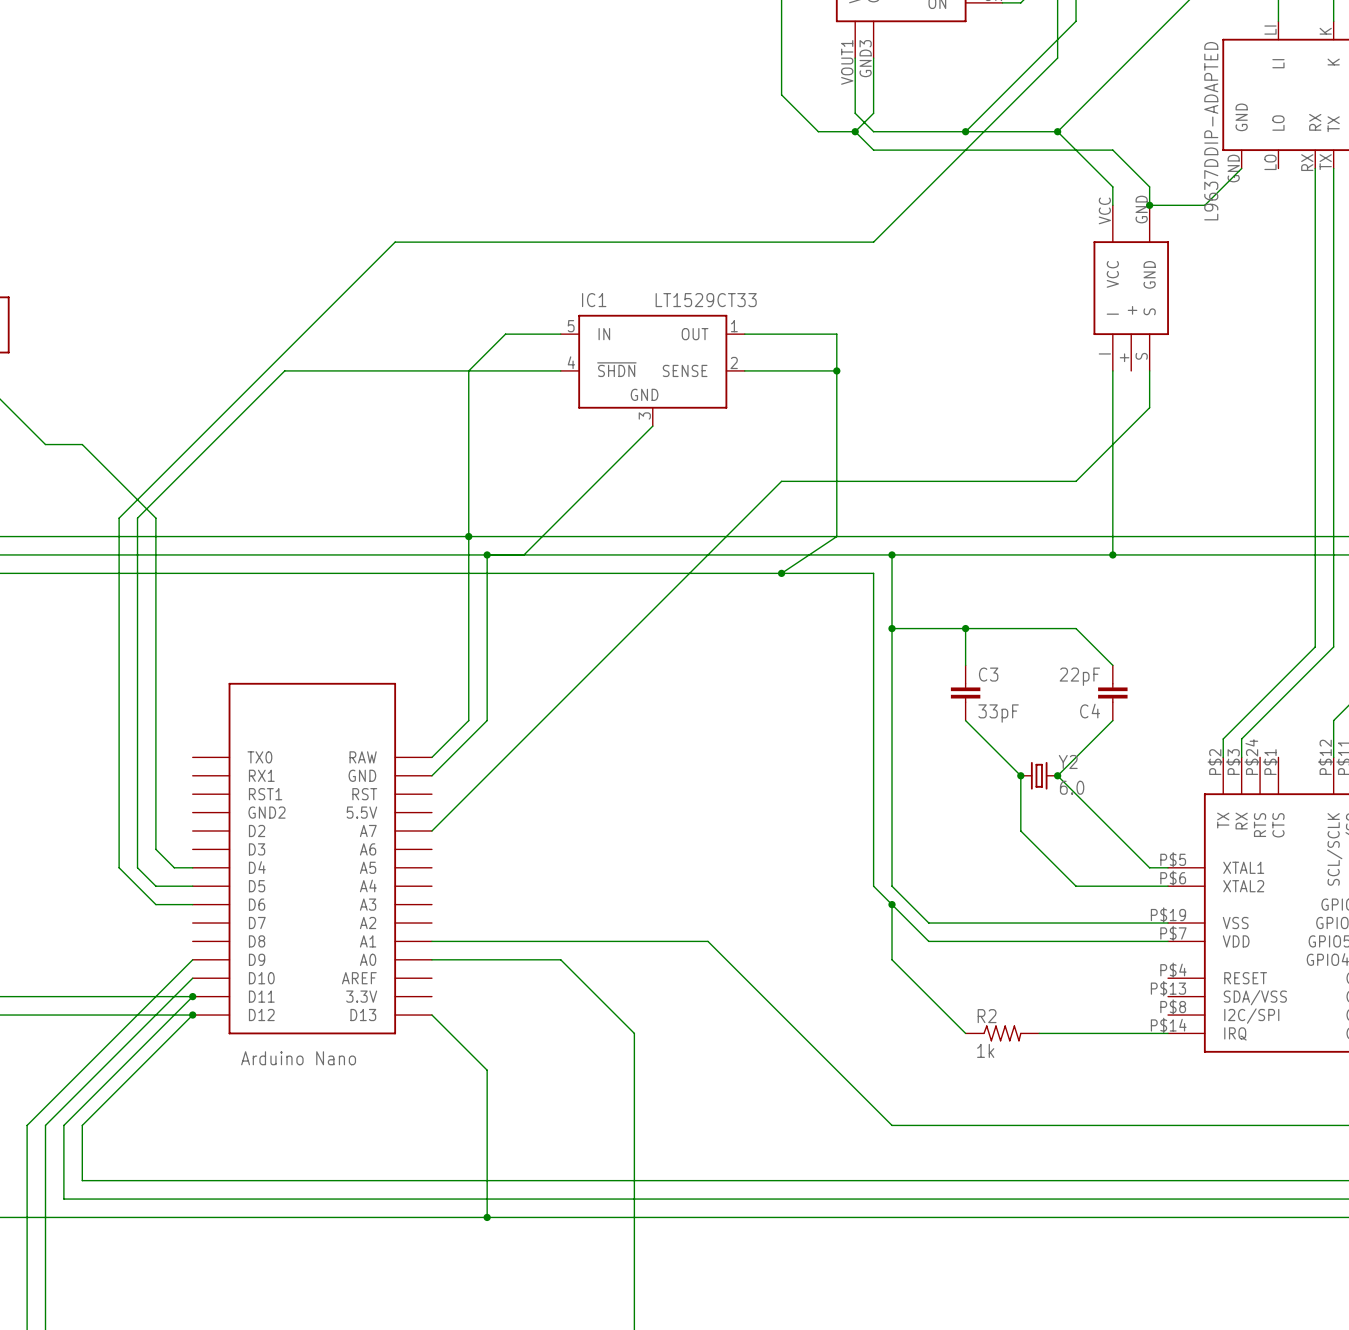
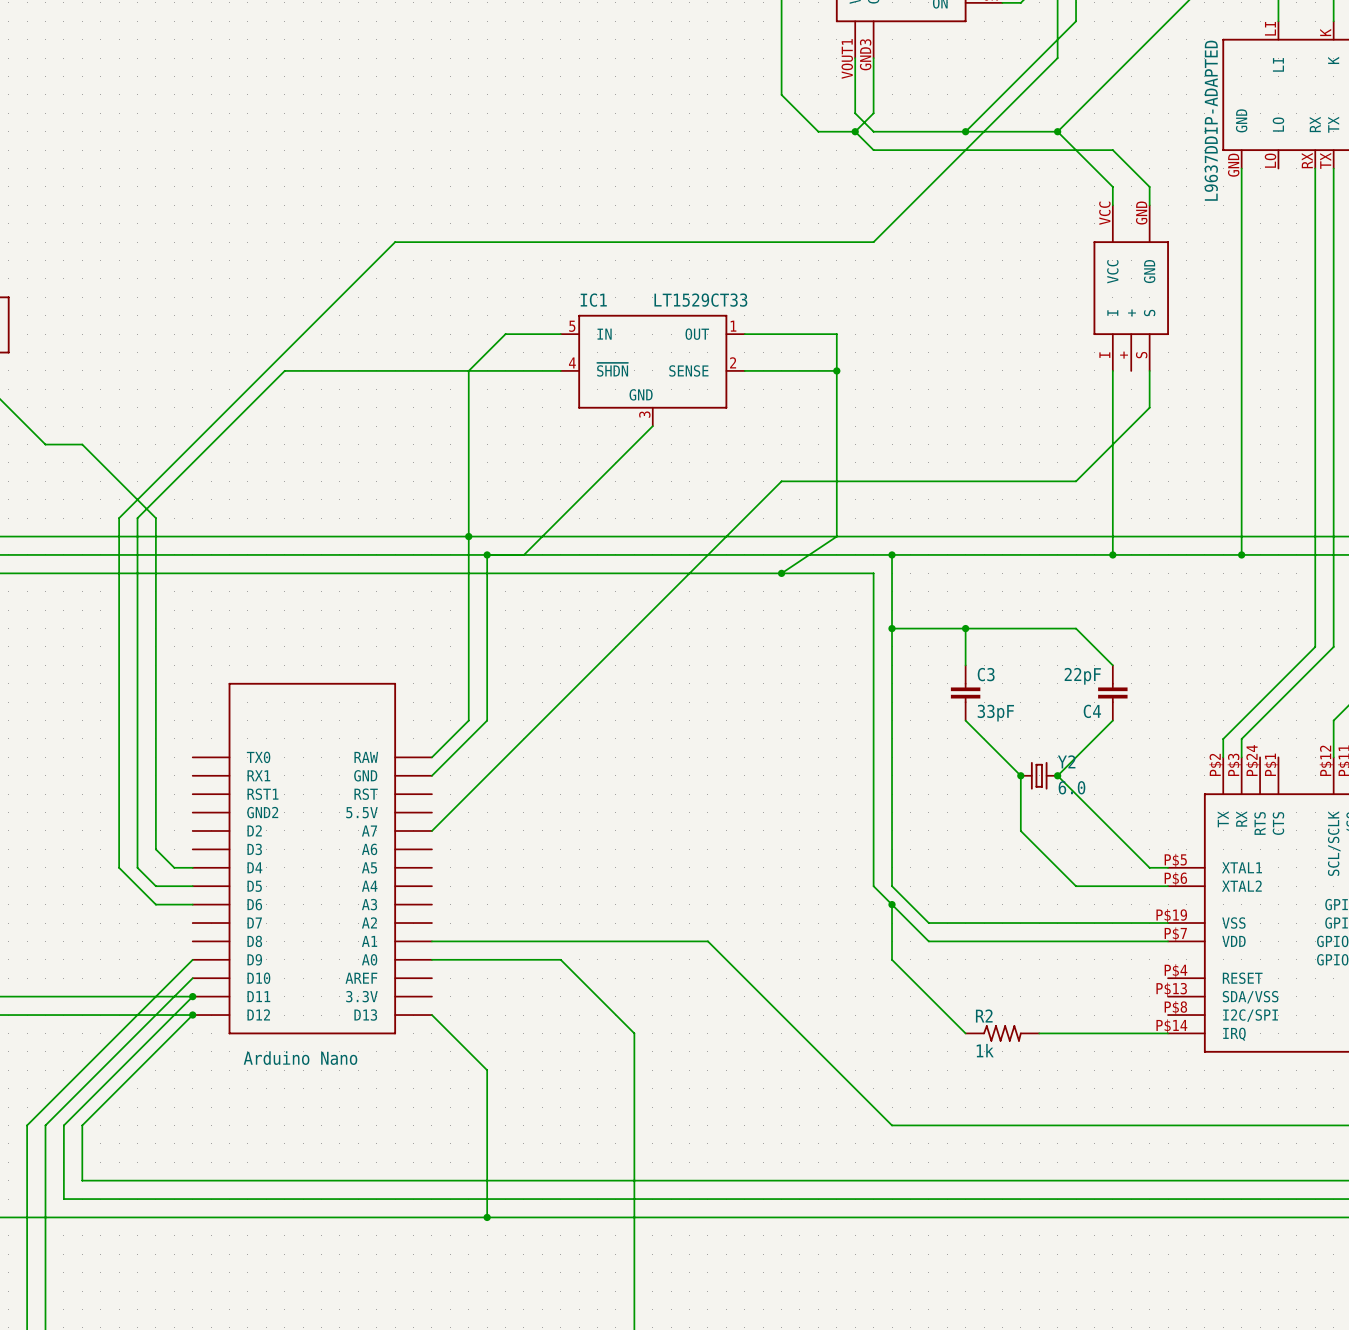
wire: (1241, 168) (1204, 205) (1149, 205) -> (1241, 168) (1241, 554)
junction: (1149, 205) -> none
junction: none -> (1241, 554)

